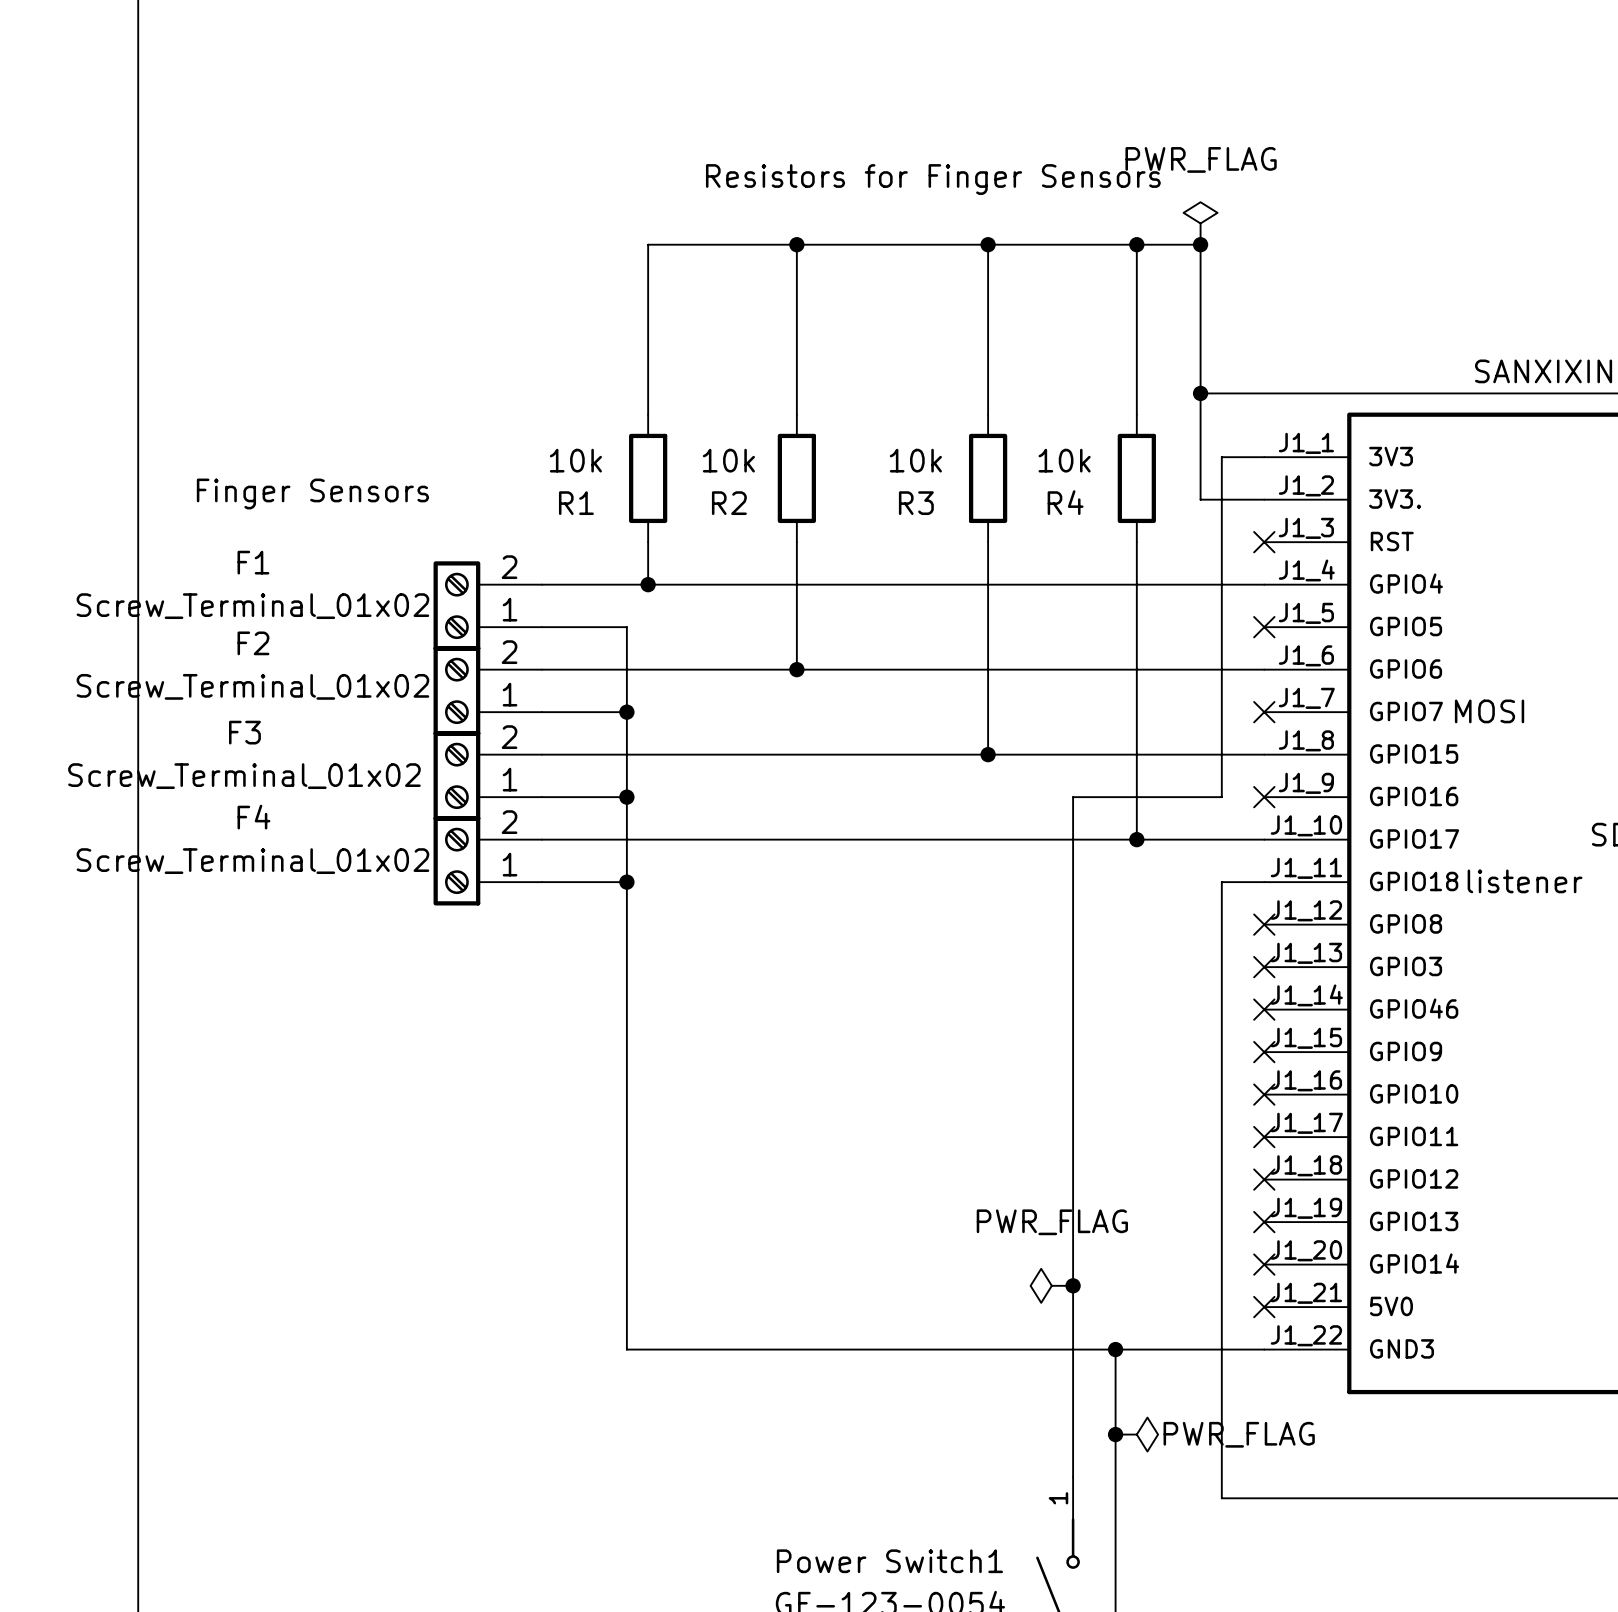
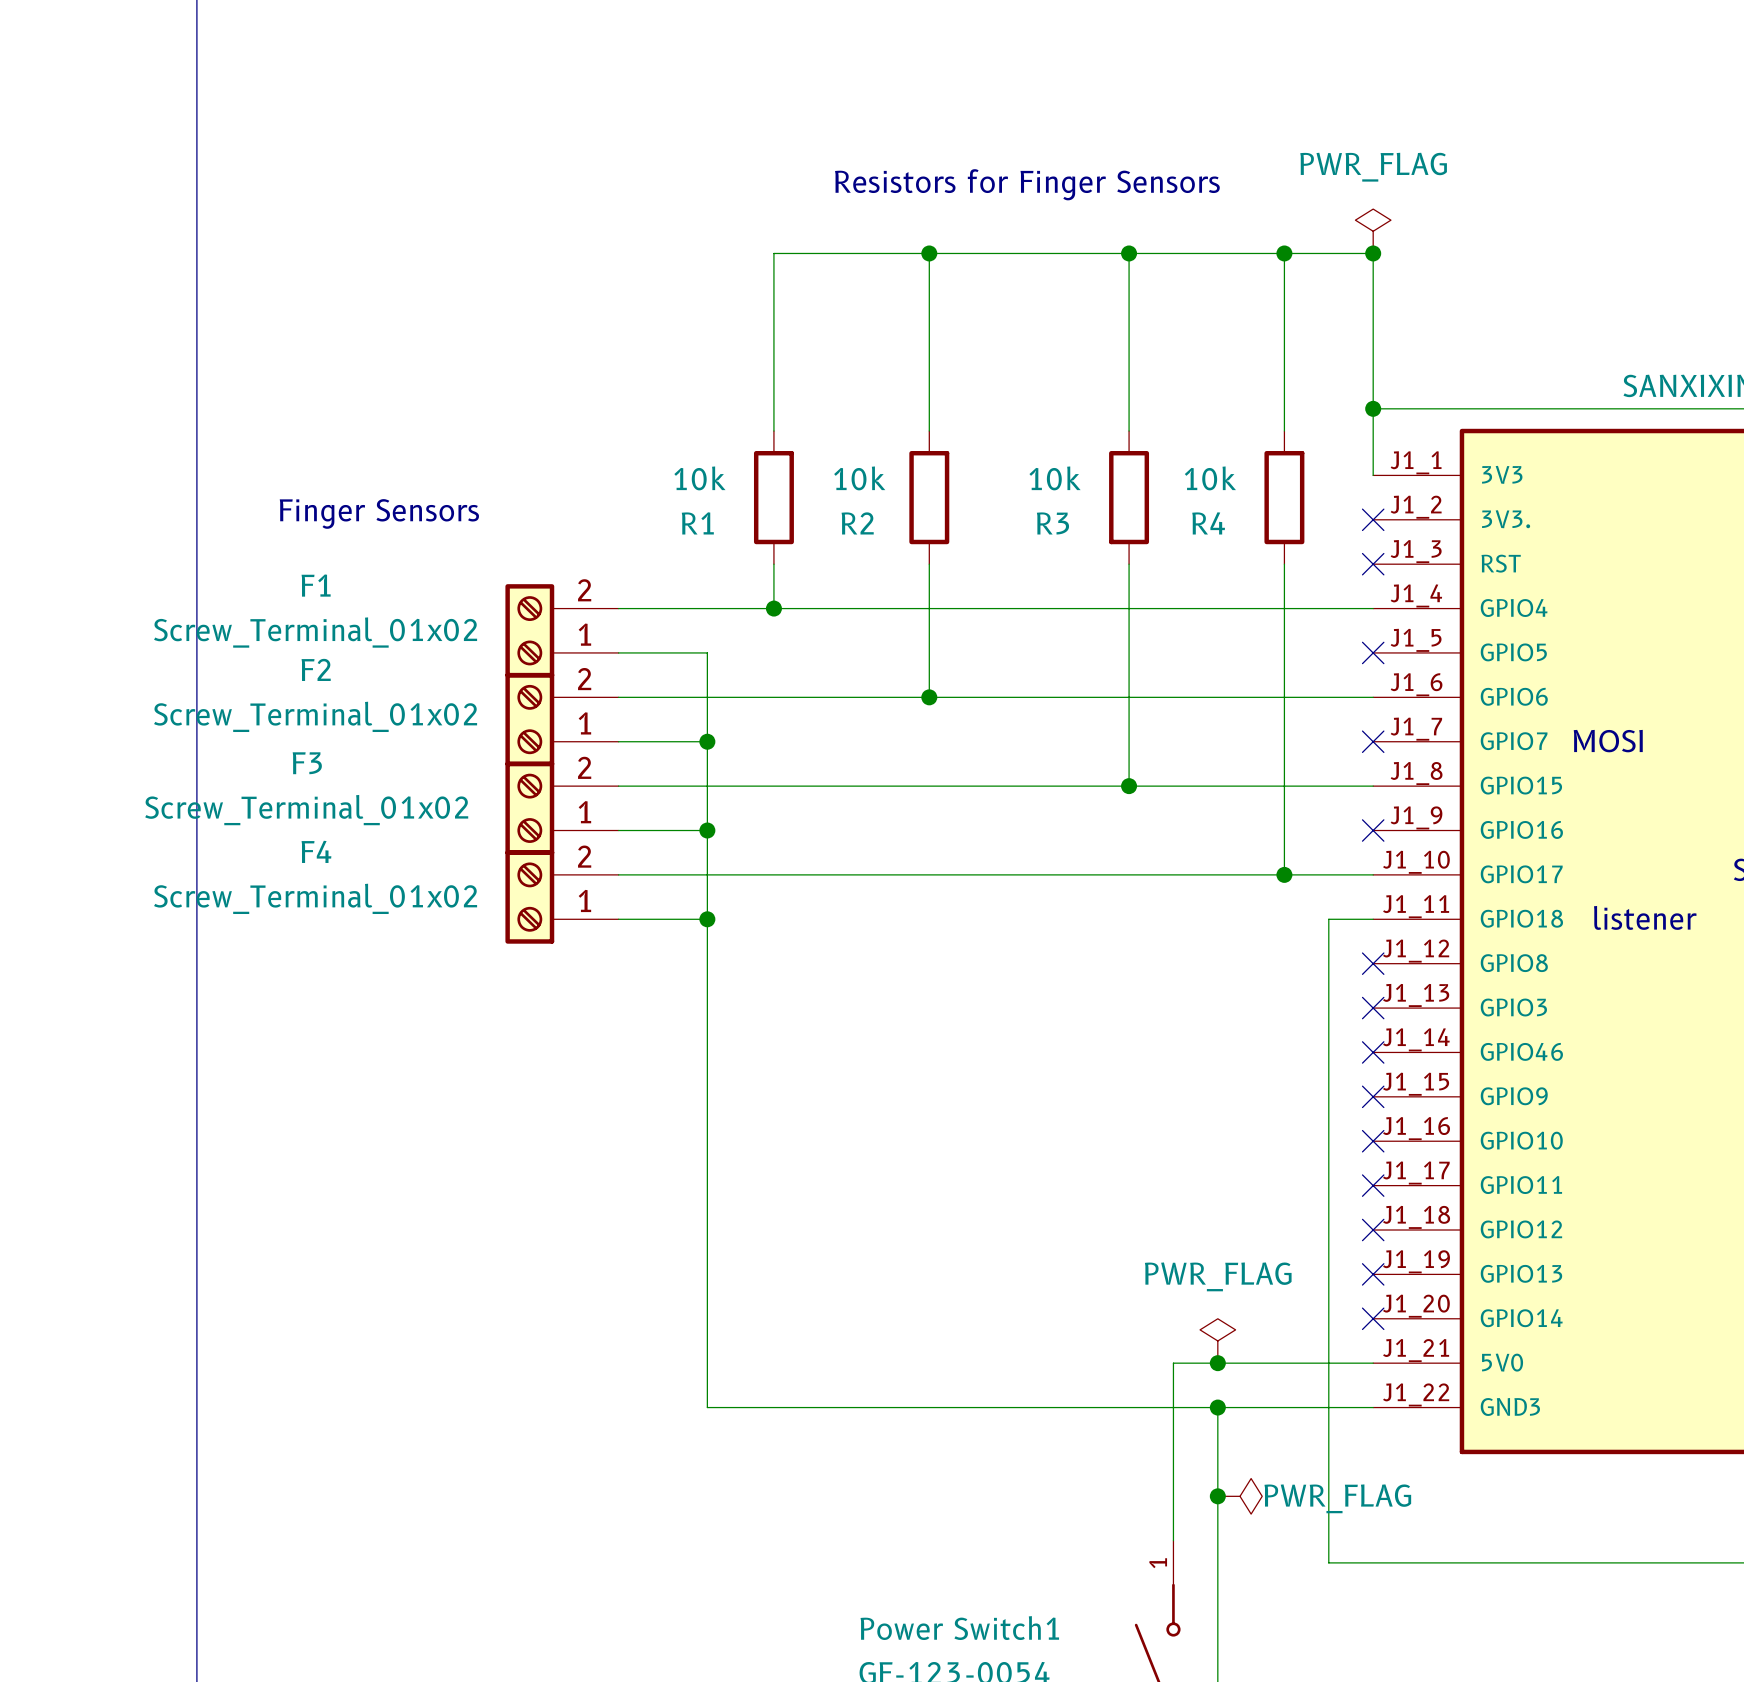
power symbol position: PWR_FLAG (1200, 223) -> PWR_FLAG (1373, 231)
wire: (690, 244) (648, 244) (648, 414) -> (773, 253) (773, 431)
wire: (796, 244) (796, 414) -> (929, 253) (929, 431)
junction position: (796, 244) -> (929, 253)
wire: (988, 244) (988, 414) -> (1129, 253) (1129, 431)
junction position: (988, 244) -> (1129, 253)
wire: (1136, 244) (1136, 414) -> (1284, 253) (1284, 431)
junction: (1136, 244) -> none
junction: none -> (1284, 253)
wire: (1200, 244) (1200, 499) (1264, 499) -> (1306, 253) (1373, 253) (1373, 475)
junction: (1200, 244) -> none
junction: none -> (1373, 253)
wire: (1200, 393) (1264, 393) -> none
junction position: (1200, 393) -> (1373, 408)
wire: (1264, 457) (1221, 457) (1221, 797) (1073, 797) (1073, 1307) -> (1373, 1363) (1173, 1363)
R1 position: (648, 478) -> (773, 497)
R2 position: (796, 478) -> (929, 497)
R3 position: (988, 478) -> (1129, 497)
R4 position: (1136, 478) -> (1284, 497)
no-connect mark: none -> (1373, 519)
wire: (648, 542) (648, 584) -> (773, 564) (773, 608)
wire: (796, 542) (796, 669) -> (929, 564) (929, 697)
wire: (988, 542) (988, 754) -> (1129, 564) (1129, 786)
wire: (1136, 542) (1136, 839) -> (1284, 564) (1284, 874)
junction position: (648, 584) -> (773, 608)
junction position: (796, 669) -> (929, 697)
junction position: (988, 754) -> (1129, 786)
junction position: (1136, 839) -> (1284, 874)
power symbol rotation: 0° (1051, 1285) -> 90° clockwise (1217, 1340)
power symbol position: PWR_FLAG (1051, 1285) -> PWR_FLAG (1217, 1340)
junction position: (1073, 1285) -> (1217, 1363)
no-connect mark: (1264, 1307) -> none

